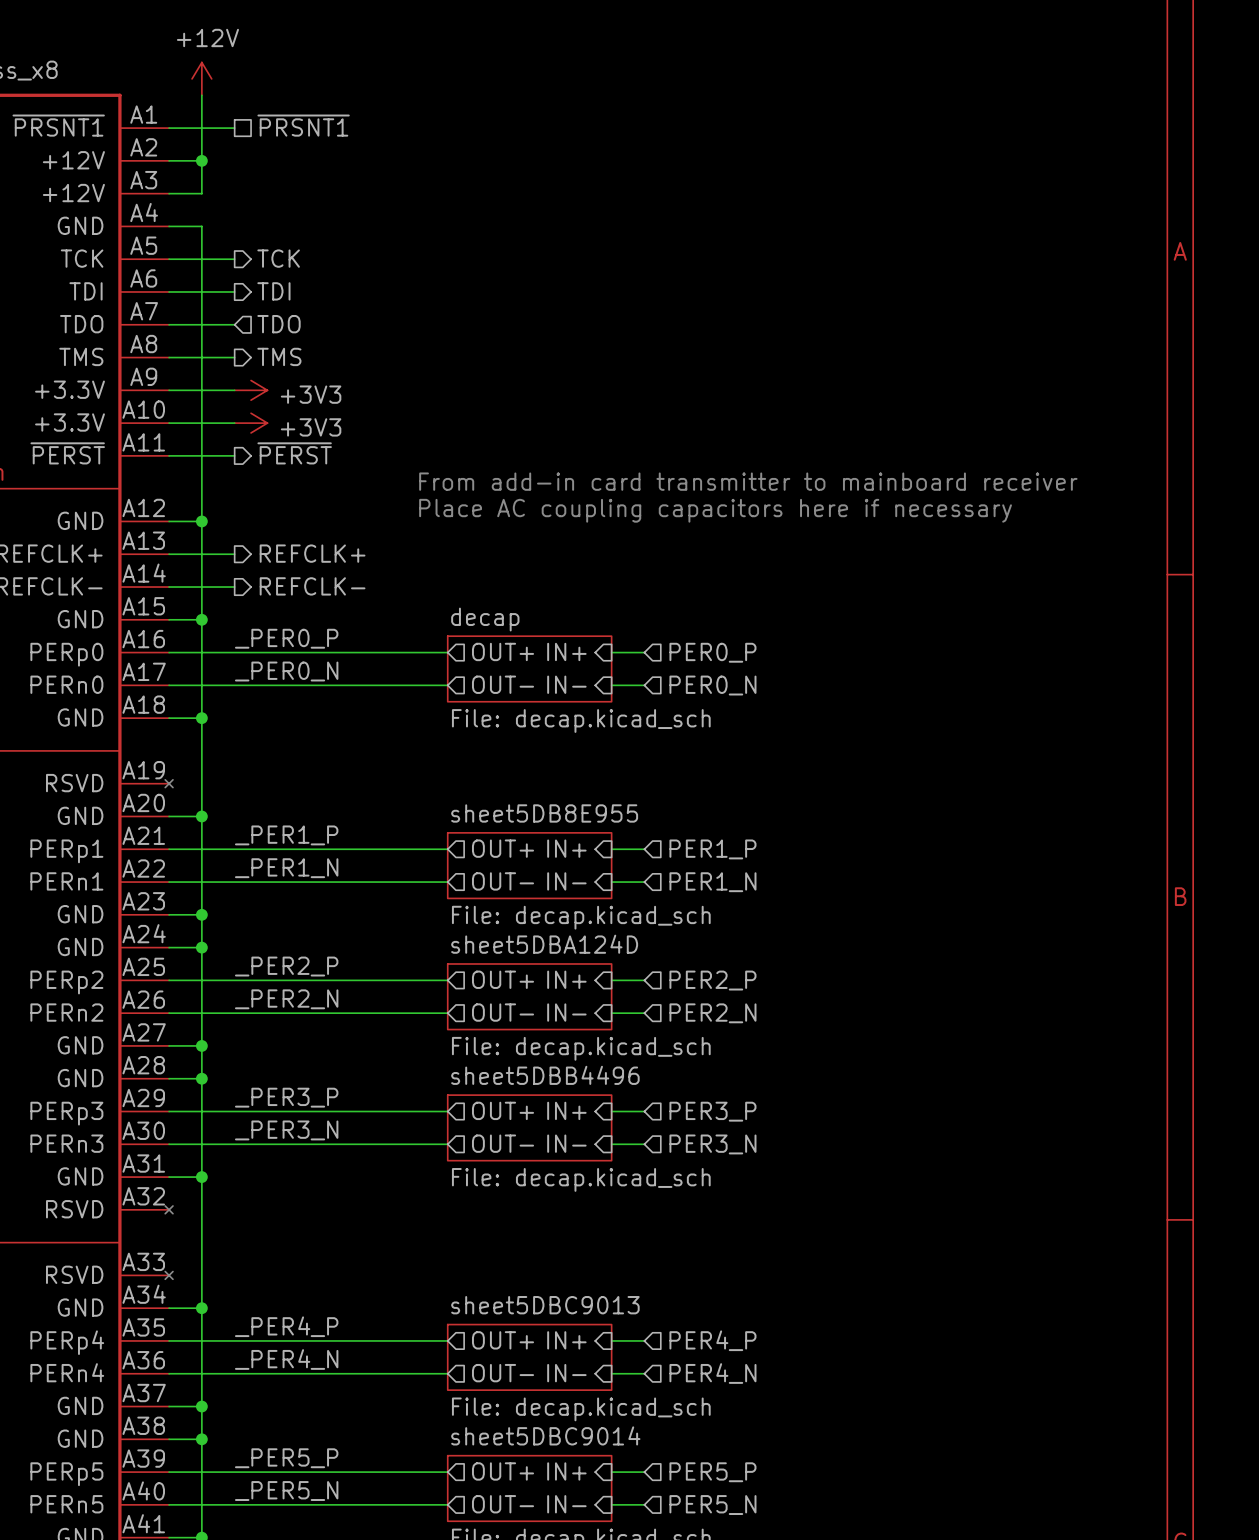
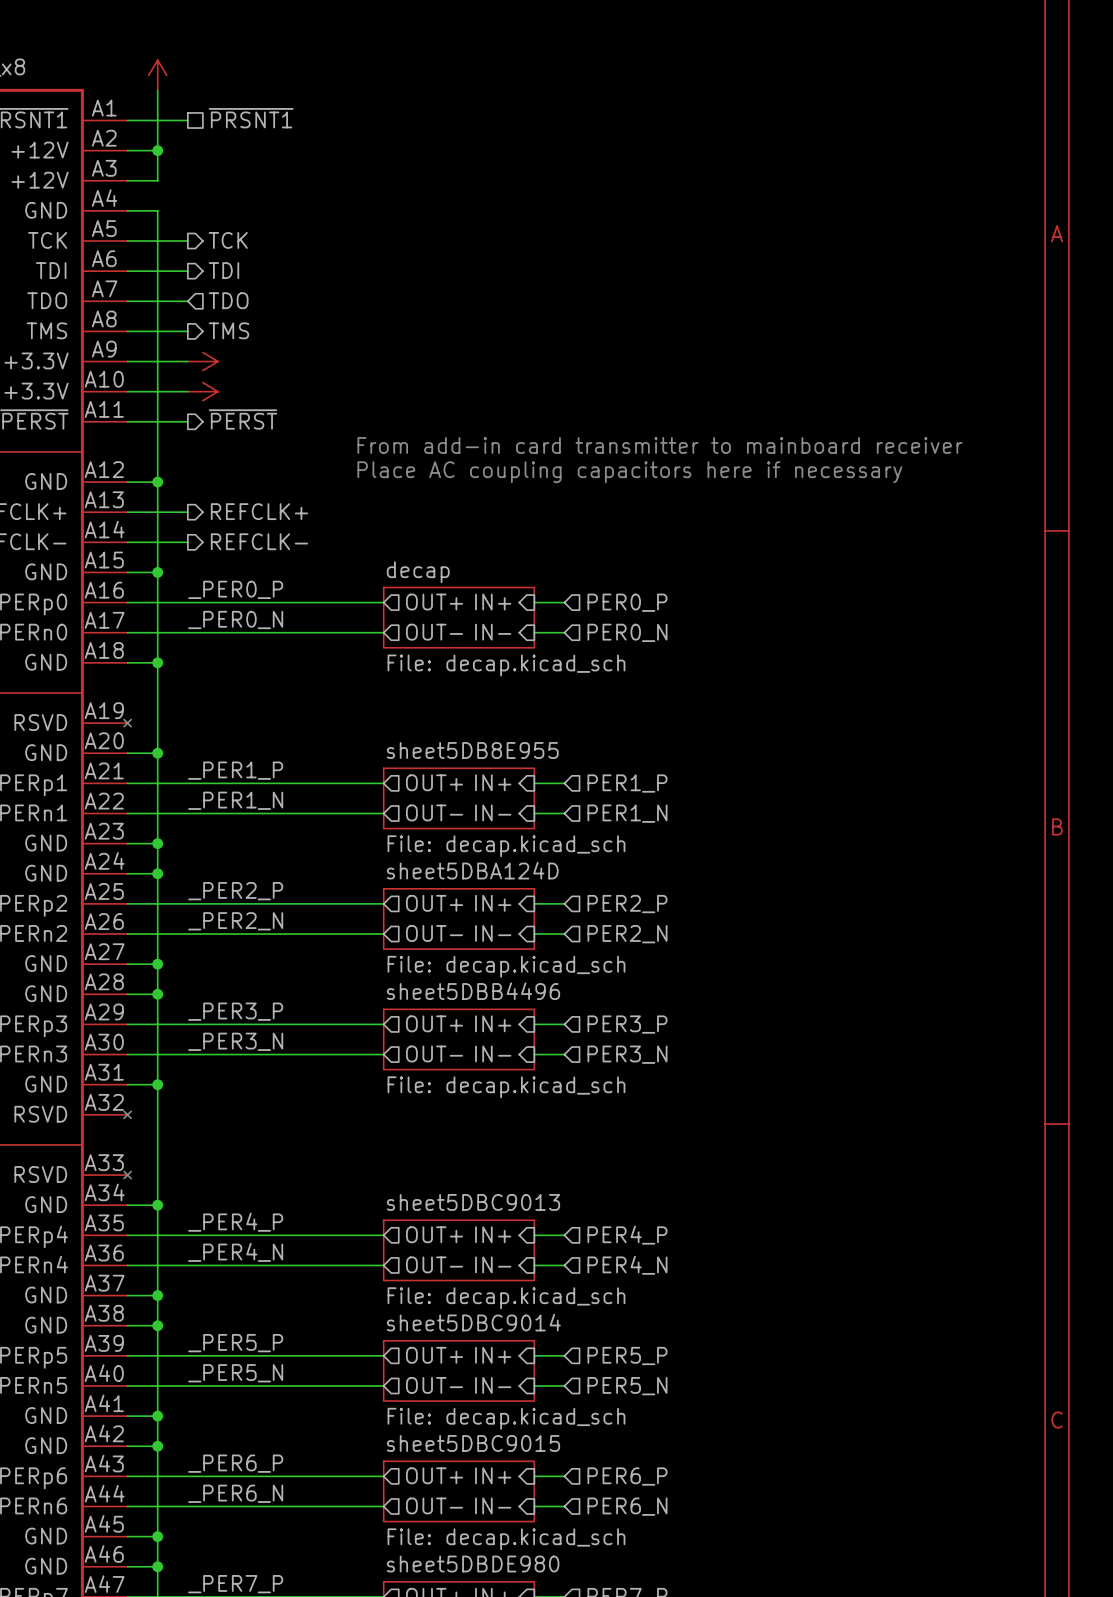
power symbol text: +12V (207, 37) -> none
power symbol text: +3V3 (311, 394) -> none
power symbol text: +3V3 (311, 427) -> none

